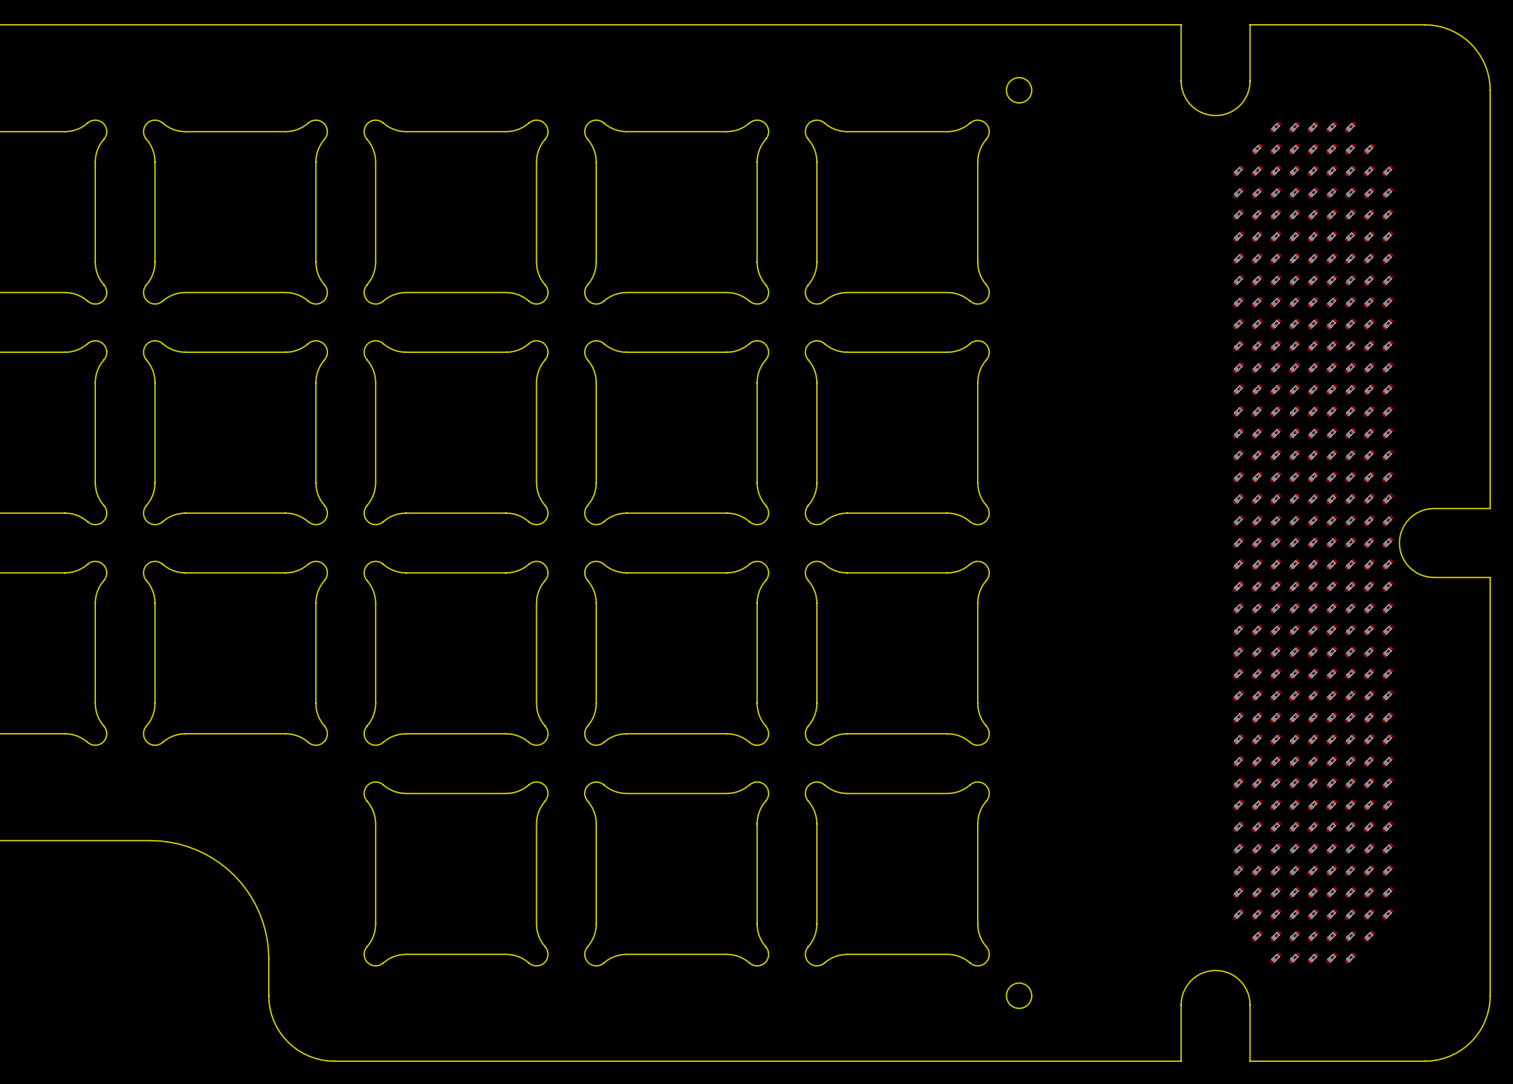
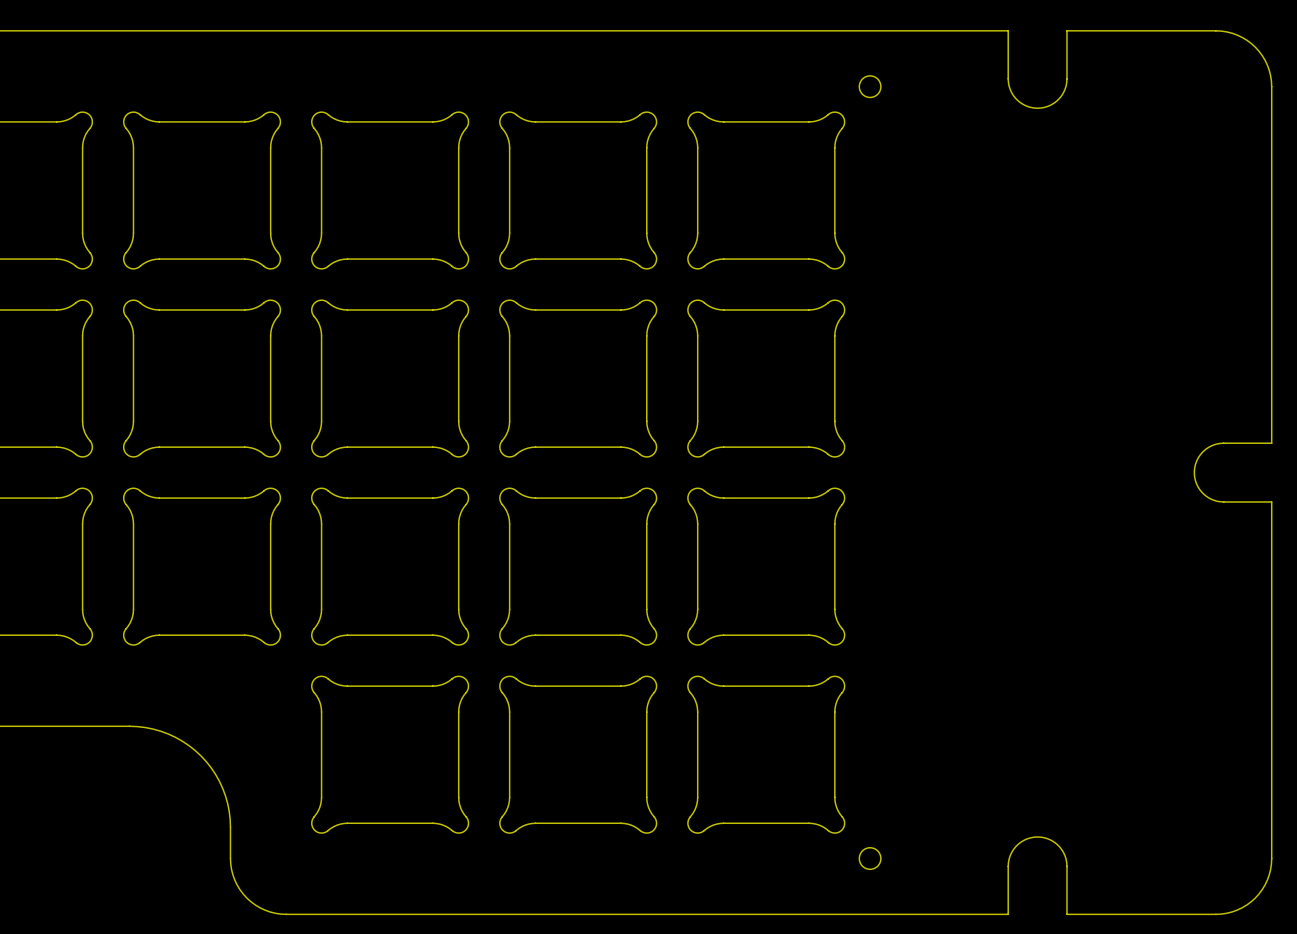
part: (1275, 127) -> none
part: (1294, 127) -> none
part: (1312, 127) -> none
part: (1331, 127) -> none
part: (1350, 127) -> none
part: (1256, 149) -> none
part: (1275, 149) -> none
part: (1294, 149) -> none
part: (1312, 149) -> none
part: (1331, 149) -> none
part: (1350, 149) -> none
part: (1368, 149) -> none
part: (1238, 171) -> none
part: (1256, 171) -> none
part: (1275, 171) -> none
part: (1294, 171) -> none
part: (1312, 171) -> none
part: (1331, 171) -> none
part: (1350, 171) -> none
part: (1368, 171) -> none
part: (1387, 171) -> none
part: (1238, 192) -> none
part: (1256, 192) -> none
part: (1275, 192) -> none
part: (1294, 192) -> none
part: (1312, 192) -> none
part: (1331, 192) -> none
part: (1350, 192) -> none
part: (1368, 192) -> none
part: (1387, 192) -> none
part: (1238, 214) -> none
part: (1256, 214) -> none
part: (1275, 214) -> none
part: (1294, 214) -> none
part: (1312, 214) -> none
part: (1331, 214) -> none
part: (1350, 214) -> none
part: (1368, 214) -> none
part: (1387, 214) -> none
part: (1238, 236) -> none
part: (1256, 236) -> none
part: (1275, 236) -> none
part: (1294, 236) -> none
part: (1312, 236) -> none
part: (1331, 236) -> none
part: (1350, 236) -> none
part: (1368, 236) -> none
part: (1387, 236) -> none
part: (1238, 258) -> none
part: (1256, 258) -> none
part: (1275, 258) -> none
part: (1294, 258) -> none
part: (1312, 258) -> none
part: (1331, 258) -> none
part: (1350, 258) -> none
part: (1368, 258) -> none
part: (1387, 258) -> none
part: (1238, 280) -> none
part: (1256, 280) -> none
part: (1275, 280) -> none
part: (1294, 280) -> none
part: (1312, 280) -> none
part: (1331, 280) -> none
part: (1350, 280) -> none
part: (1368, 280) -> none
part: (1387, 280) -> none
part: (1238, 302) -> none
part: (1256, 302) -> none
part: (1275, 302) -> none
part: (1294, 302) -> none
part: (1312, 302) -> none
part: (1331, 302) -> none
part: (1350, 302) -> none
part: (1368, 302) -> none
part: (1387, 302) -> none
part: (1238, 324) -> none
part: (1256, 324) -> none
part: (1275, 324) -> none
part: (1294, 324) -> none
part: (1312, 324) -> none
part: (1331, 324) -> none
part: (1350, 324) -> none
part: (1368, 324) -> none
part: (1387, 324) -> none
part: (1238, 345) -> none
part: (1256, 345) -> none
part: (1275, 345) -> none
part: (1294, 345) -> none
part: (1312, 345) -> none
part: (1331, 345) -> none
part: (1350, 345) -> none
part: (1368, 345) -> none
part: (1387, 345) -> none
part: (1238, 367) -> none
part: (1256, 367) -> none
part: (1275, 367) -> none
part: (1294, 367) -> none
part: (1312, 367) -> none
part: (1331, 367) -> none
part: (1350, 367) -> none
part: (1368, 367) -> none
part: (1387, 367) -> none
part: (1238, 389) -> none
part: (1256, 389) -> none
part: (1275, 389) -> none
part: (1294, 389) -> none
part: (1312, 389) -> none
part: (1331, 389) -> none
part: (1350, 389) -> none
part: (1368, 389) -> none
part: (1387, 389) -> none
part: (1238, 411) -> none
part: (1256, 411) -> none
part: (1275, 411) -> none
part: (1294, 411) -> none
part: (1312, 411) -> none
part: (1331, 411) -> none
part: (1350, 411) -> none
part: (1368, 411) -> none
part: (1387, 411) -> none
part: (1238, 433) -> none
part: (1256, 433) -> none
part: (1275, 433) -> none
part: (1294, 433) -> none
part: (1312, 433) -> none
part: (1331, 433) -> none
part: (1350, 433) -> none
part: (1368, 433) -> none
part: (1387, 433) -> none
part: (1238, 455) -> none
part: (1256, 455) -> none
part: (1275, 455) -> none
part: (1294, 455) -> none
part: (1312, 455) -> none
part: (1331, 455) -> none
part: (1350, 455) -> none
part: (1368, 455) -> none
part: (1387, 455) -> none
part: (1238, 477) -> none
part: (1256, 477) -> none
part: (1275, 477) -> none
part: (1294, 477) -> none
part: (1312, 477) -> none
part: (1331, 477) -> none
part: (1350, 477) -> none
part: (1368, 477) -> none
part: (1387, 477) -> none
part: (1238, 499) -> none
part: (1256, 499) -> none
part: (1275, 499) -> none
part: (1294, 499) -> none
part: (1312, 499) -> none
part: (1331, 499) -> none
part: (1350, 499) -> none
part: (1368, 499) -> none
part: (1387, 499) -> none
part: (1238, 520) -> none
part: (1256, 520) -> none
part: (1275, 520) -> none
part: (1294, 520) -> none
part: (1312, 520) -> none
part: (1331, 520) -> none
part: (1350, 520) -> none
part: (1368, 520) -> none
part: (1387, 520) -> none
part: (1238, 542) -> none
part: (1256, 542) -> none
part: (1275, 542) -> none
part: (1294, 542) -> none
part: (1312, 542) -> none
part: (1331, 542) -> none
part: (1350, 542) -> none
part: (1368, 542) -> none
part: (1387, 542) -> none
part: (1238, 564) -> none
part: (1256, 564) -> none
part: (1275, 564) -> none
part: (1294, 564) -> none
part: (1312, 564) -> none
part: (1331, 564) -> none
part: (1350, 564) -> none
part: (1368, 564) -> none
part: (1387, 564) -> none
part: (1238, 586) -> none
part: (1256, 586) -> none
part: (1275, 586) -> none
part: (1294, 586) -> none
part: (1312, 586) -> none
part: (1331, 586) -> none
part: (1350, 586) -> none
part: (1368, 586) -> none
part: (1387, 586) -> none
part: (1238, 608) -> none
part: (1256, 608) -> none
part: (1275, 608) -> none
part: (1294, 608) -> none
part: (1312, 608) -> none
part: (1331, 608) -> none
part: (1350, 608) -> none
part: (1368, 608) -> none
part: (1387, 608) -> none
part: (1238, 630) -> none
part: (1256, 630) -> none
part: (1275, 630) -> none
part: (1294, 630) -> none
part: (1312, 630) -> none
part: (1331, 630) -> none
part: (1350, 630) -> none
part: (1368, 630) -> none
part: (1387, 630) -> none
part: (1238, 652) -> none
part: (1256, 652) -> none
part: (1275, 652) -> none
part: (1294, 652) -> none
part: (1312, 652) -> none
part: (1331, 652) -> none
part: (1350, 652) -> none
part: (1368, 652) -> none
part: (1387, 652) -> none
part: (1238, 673) -> none
part: (1256, 673) -> none
part: (1275, 673) -> none
part: (1294, 673) -> none
part: (1312, 673) -> none
part: (1331, 673) -> none
part: (1350, 673) -> none
part: (1368, 673) -> none
part: (1387, 673) -> none
part: (1238, 695) -> none
part: (1256, 695) -> none
part: (1275, 695) -> none
part: (1294, 695) -> none
part: (1312, 695) -> none
part: (1331, 695) -> none
part: (1350, 695) -> none
part: (1368, 695) -> none
part: (1387, 695) -> none
part: (1238, 717) -> none
part: (1256, 717) -> none
part: (1275, 717) -> none
part: (1294, 717) -> none
part: (1312, 717) -> none
part: (1331, 717) -> none
part: (1350, 717) -> none
part: (1368, 717) -> none
part: (1387, 717) -> none
part: (1238, 739) -> none
part: (1256, 739) -> none
part: (1275, 739) -> none
part: (1294, 739) -> none
part: (1312, 739) -> none
part: (1331, 739) -> none
part: (1350, 739) -> none
part: (1368, 739) -> none
part: (1387, 739) -> none
part: (1238, 761) -> none
part: (1256, 761) -> none
part: (1275, 761) -> none
part: (1294, 761) -> none
part: (1312, 761) -> none
part: (1331, 761) -> none
part: (1350, 761) -> none
part: (1368, 761) -> none
part: (1387, 761) -> none
part: (1238, 783) -> none
part: (1256, 783) -> none
part: (1275, 783) -> none
part: (1294, 783) -> none
part: (1312, 783) -> none
part: (1331, 783) -> none
part: (1350, 783) -> none
part: (1368, 783) -> none
part: (1387, 783) -> none
part: (1238, 805) -> none
part: (1256, 805) -> none
part: (1275, 805) -> none
part: (1294, 805) -> none
part: (1312, 805) -> none
part: (1331, 805) -> none
part: (1350, 805) -> none
part: (1368, 805) -> none
part: (1387, 805) -> none
part: (1238, 826) -> none
part: (1256, 826) -> none
part: (1275, 826) -> none
part: (1294, 826) -> none
part: (1312, 826) -> none
part: (1331, 826) -> none
part: (1350, 826) -> none
part: (1368, 826) -> none
part: (1387, 826) -> none
part: (1238, 848) -> none
part: (1256, 848) -> none
part: (1275, 848) -> none
part: (1294, 848) -> none
part: (1312, 848) -> none
part: (1331, 848) -> none
part: (1350, 848) -> none
part: (1368, 848) -> none
part: (1387, 848) -> none
part: (1238, 870) -> none
part: (1256, 870) -> none
part: (1275, 870) -> none
part: (1294, 870) -> none
part: (1312, 870) -> none
part: (1331, 870) -> none
part: (1350, 870) -> none
part: (1368, 870) -> none
part: (1387, 870) -> none
part: (1238, 892) -> none
part: (1256, 892) -> none
part: (1275, 892) -> none
part: (1294, 892) -> none
part: (1312, 892) -> none
part: (1331, 892) -> none
part: (1350, 892) -> none
part: (1368, 892) -> none
part: (1387, 892) -> none
part: (1238, 914) -> none
part: (1256, 914) -> none
part: (1275, 914) -> none
part: (1294, 914) -> none
part: (1312, 914) -> none
part: (1331, 914) -> none
part: (1350, 914) -> none
part: (1368, 914) -> none
part: (1387, 914) -> none
part: (1256, 936) -> none
part: (1275, 936) -> none
part: (1294, 936) -> none
part: (1312, 936) -> none
part: (1331, 936) -> none
part: (1350, 936) -> none
part: (1368, 936) -> none
part: (1275, 958) -> none
part: (1294, 958) -> none
part: (1312, 958) -> none
part: (1331, 958) -> none
part: (1350, 958) -> none

